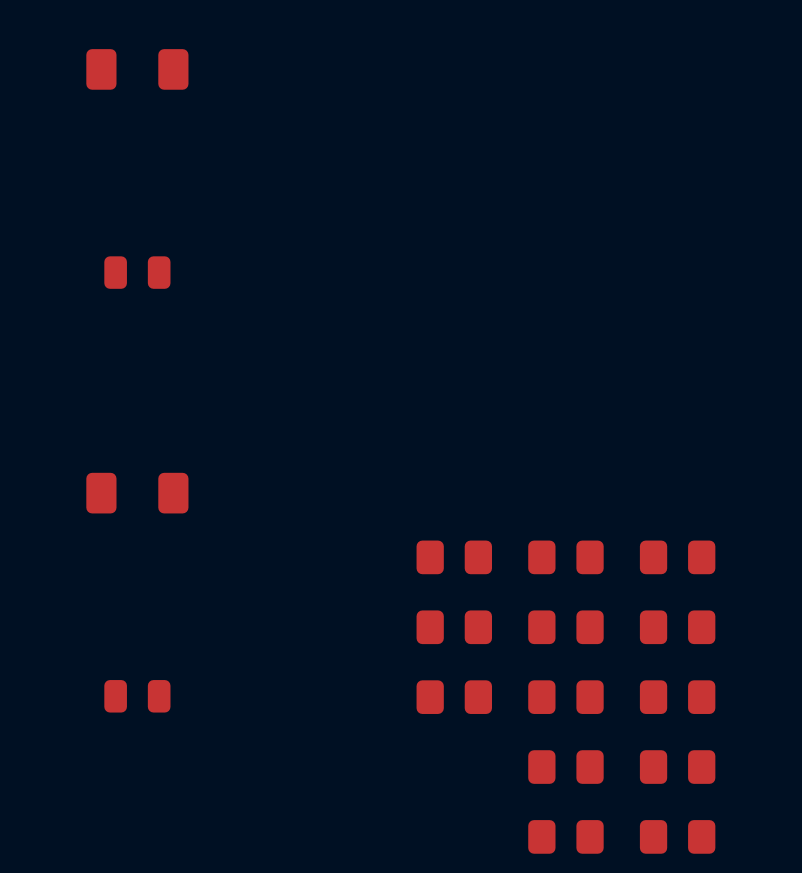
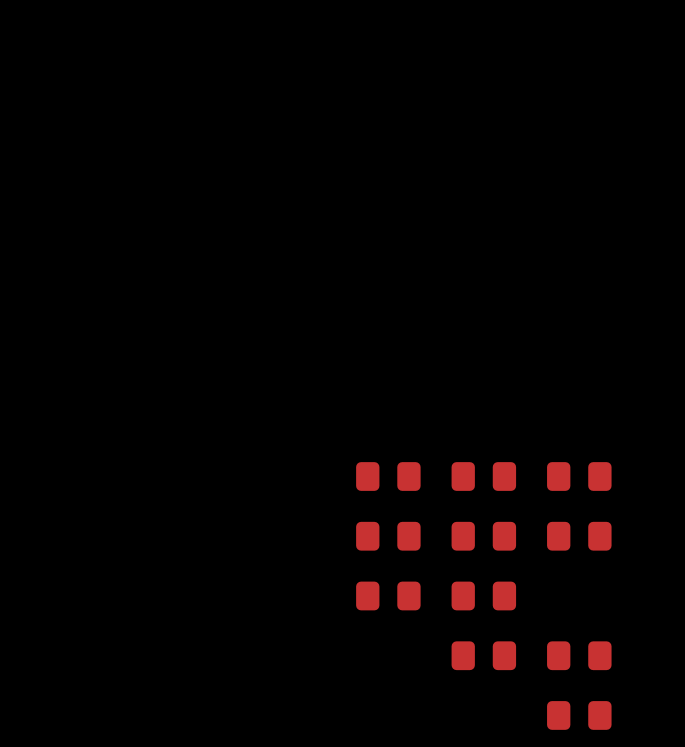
part: (137, 69) -> none
part: (137, 272) -> none
part: (137, 493) -> none
part: (137, 696) -> none
part: (677, 697) -> none
part: (565, 836) -> none

